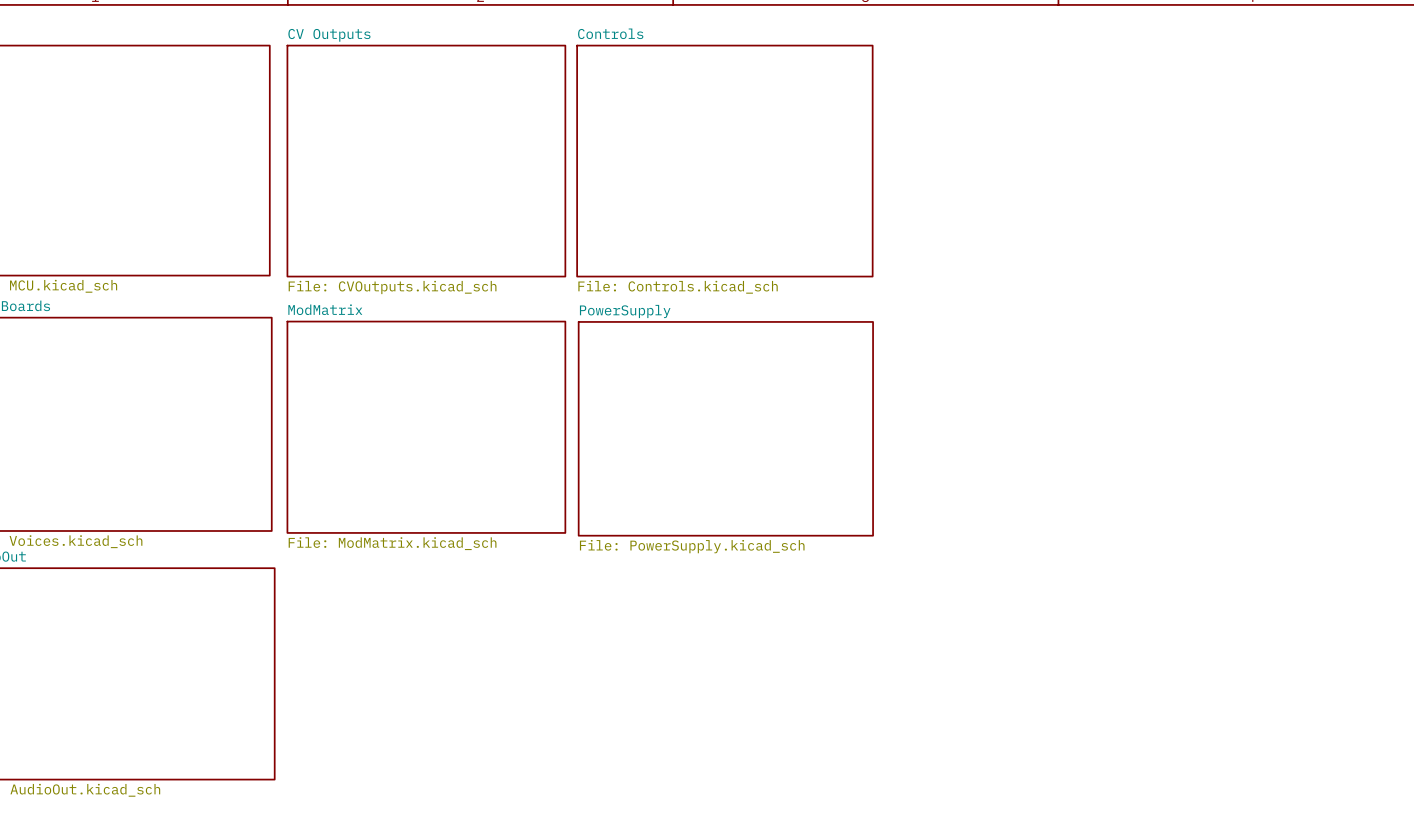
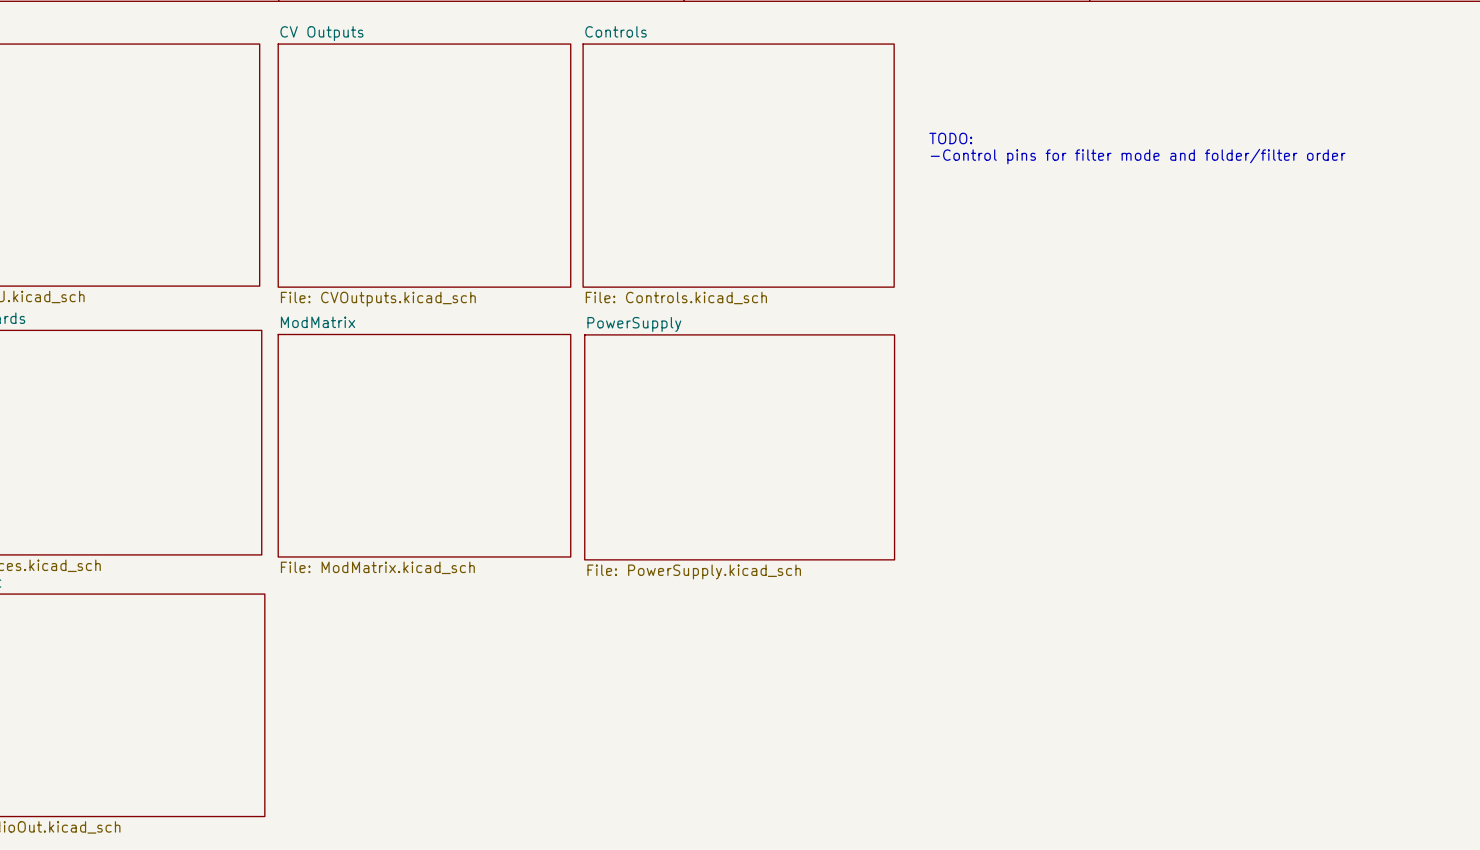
text: none -> TODO: (950, 138)
text: none -> -Control pins for filter mode and folder/filter order (1138, 156)

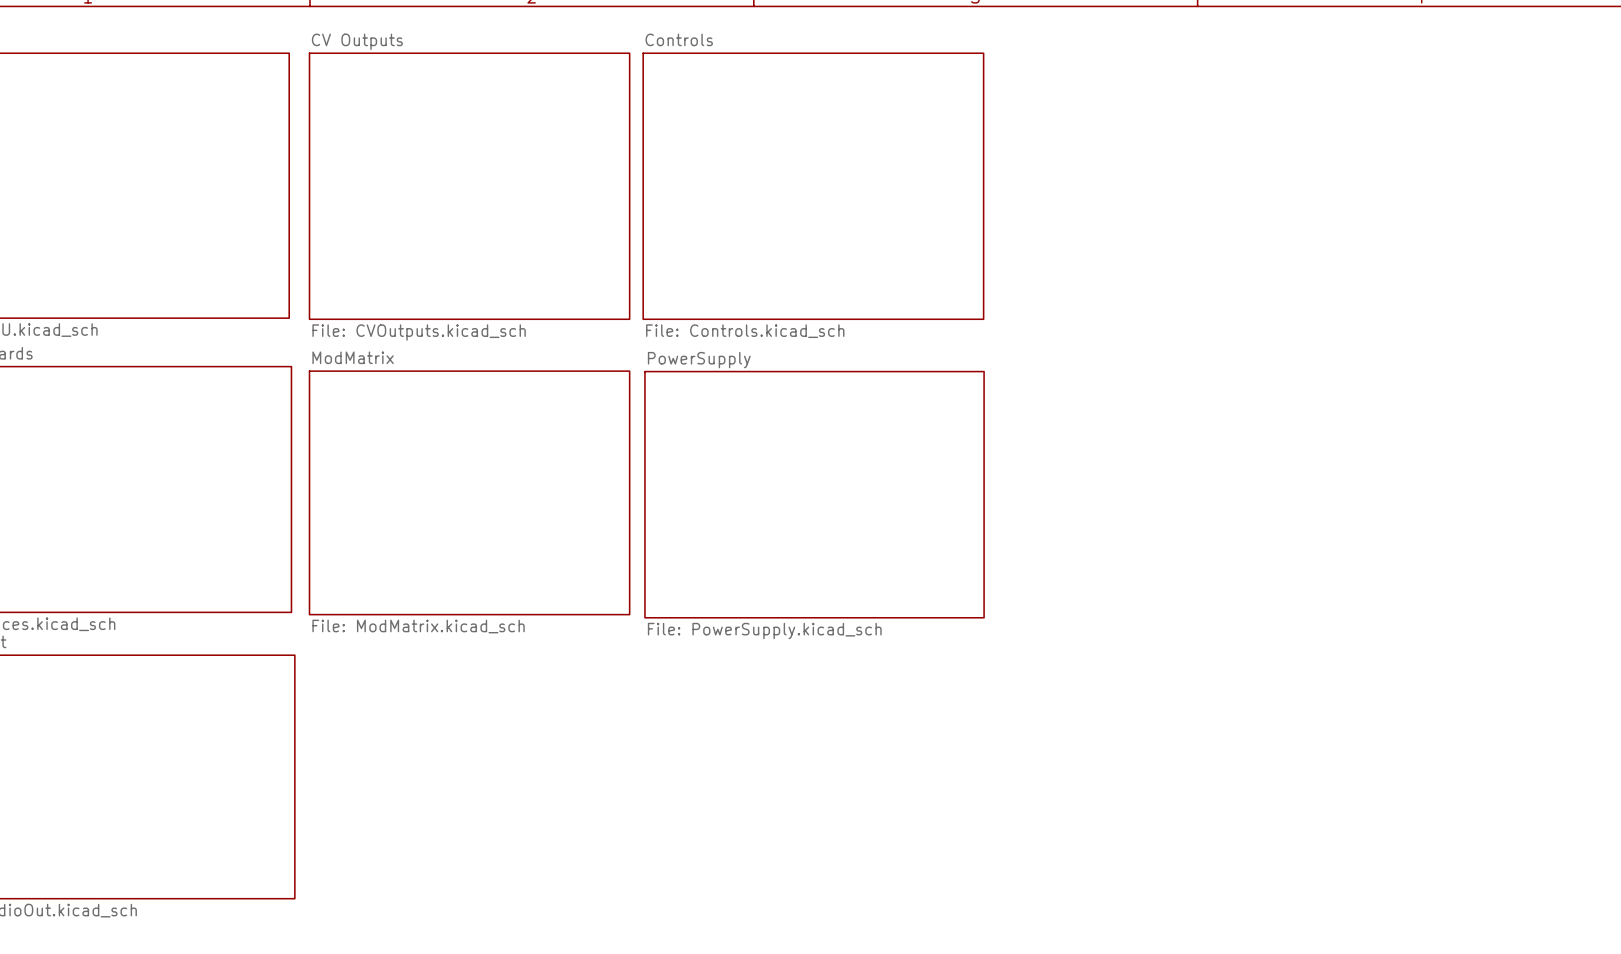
text: TODO: (950, 138) -> none
text: -Control pins for filter mode and folder/filter order (1138, 156) -> none

